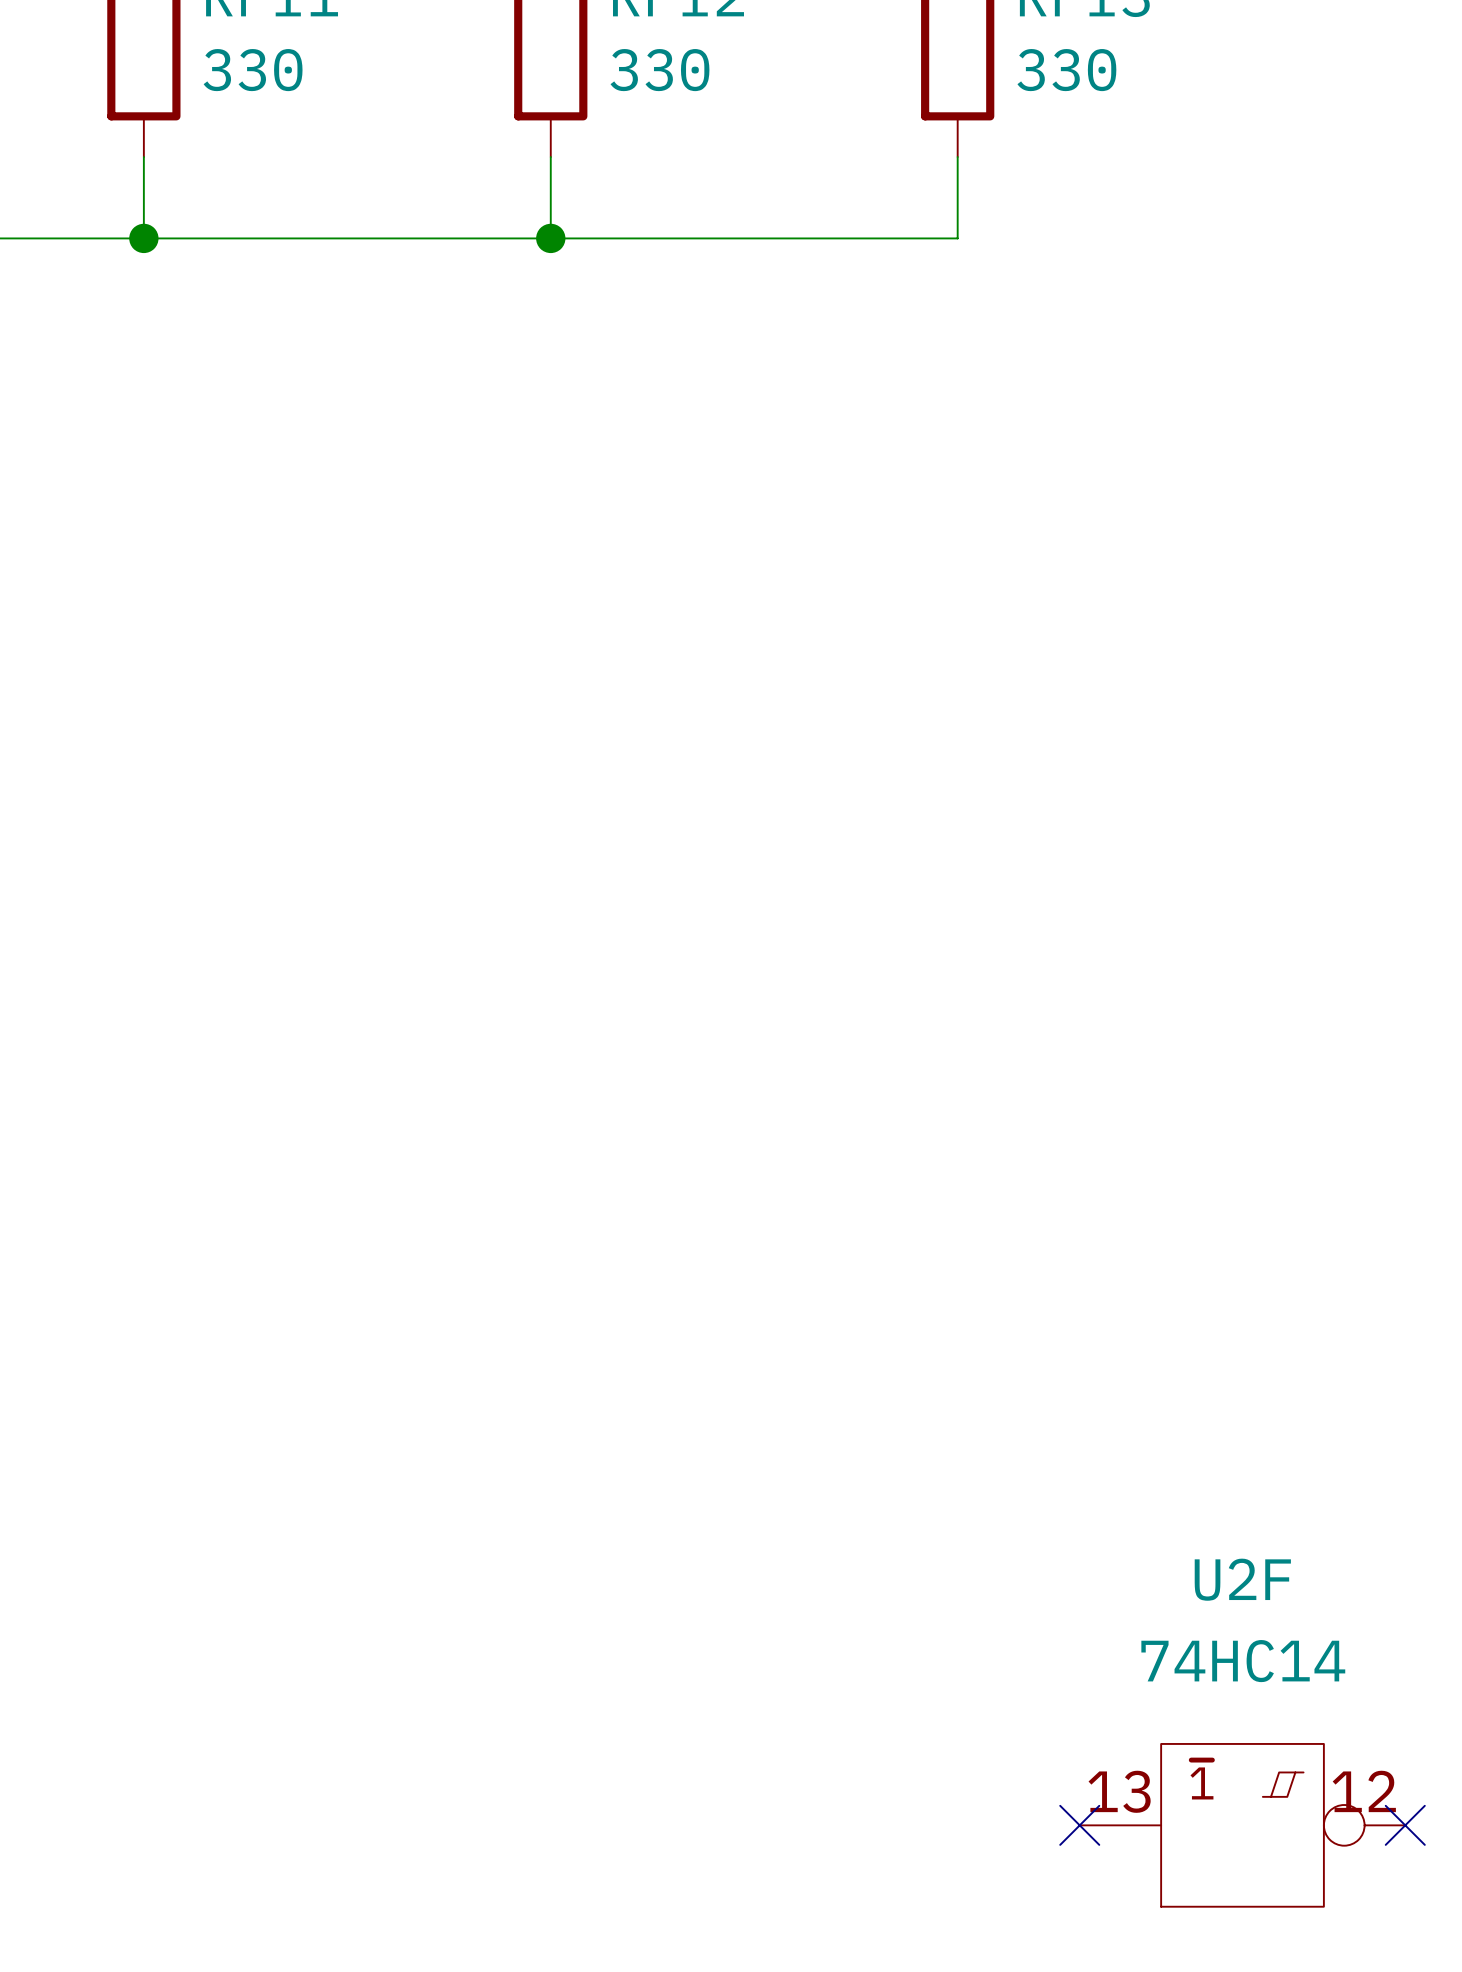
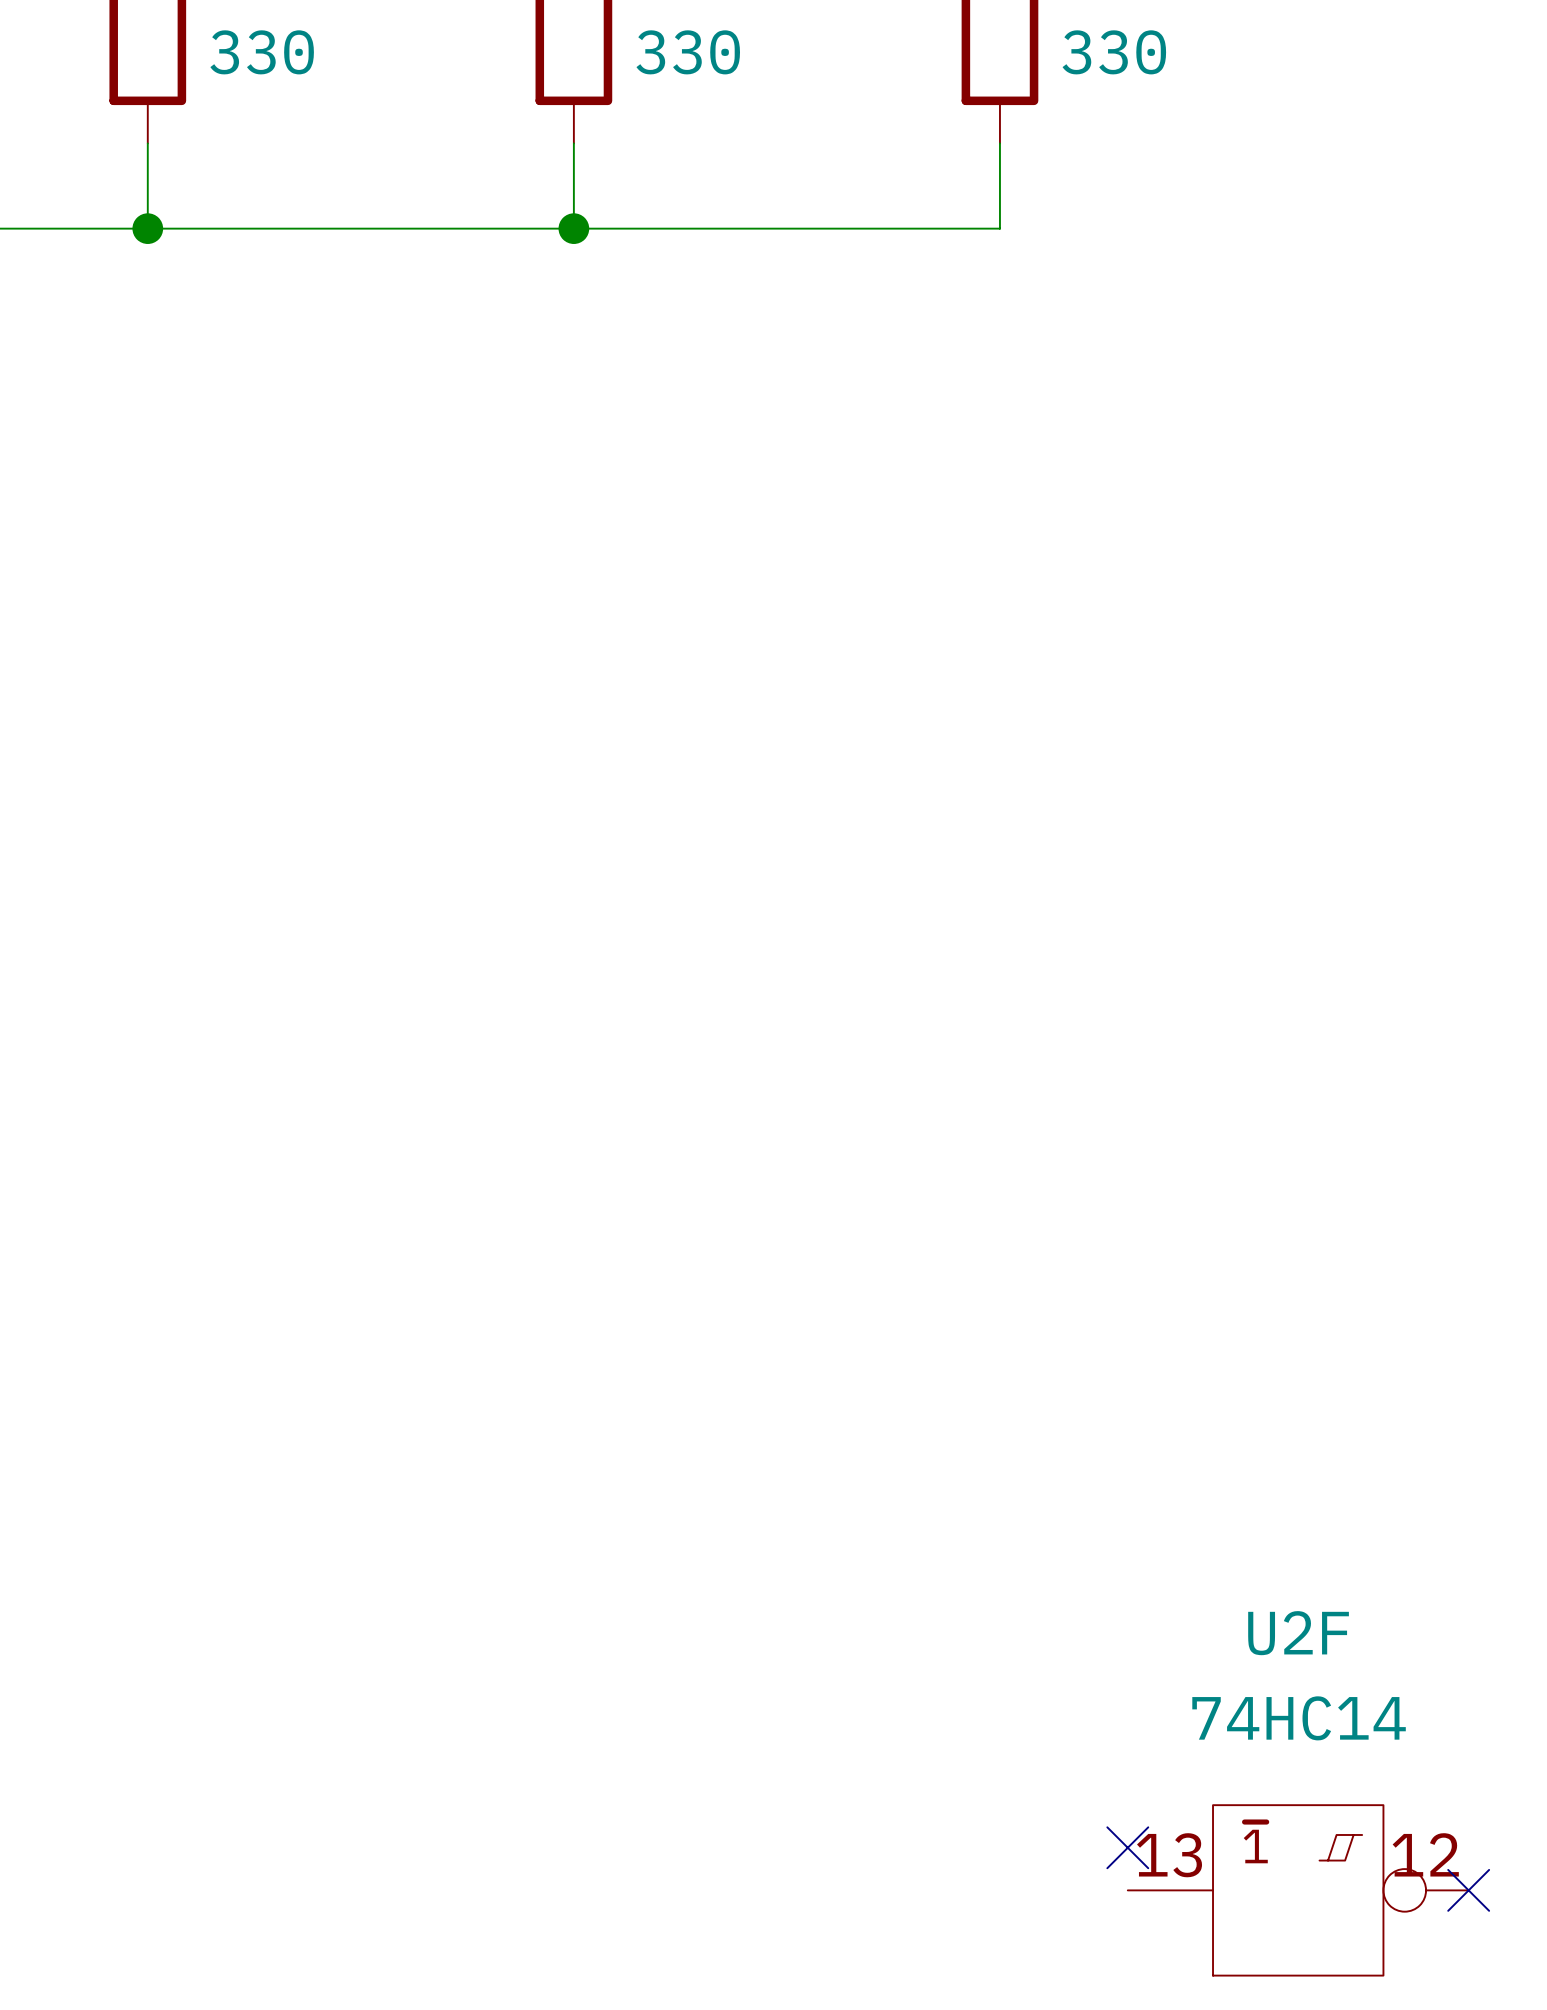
no-connect mark position: (1079, 1825) -> (1127, 1847)

